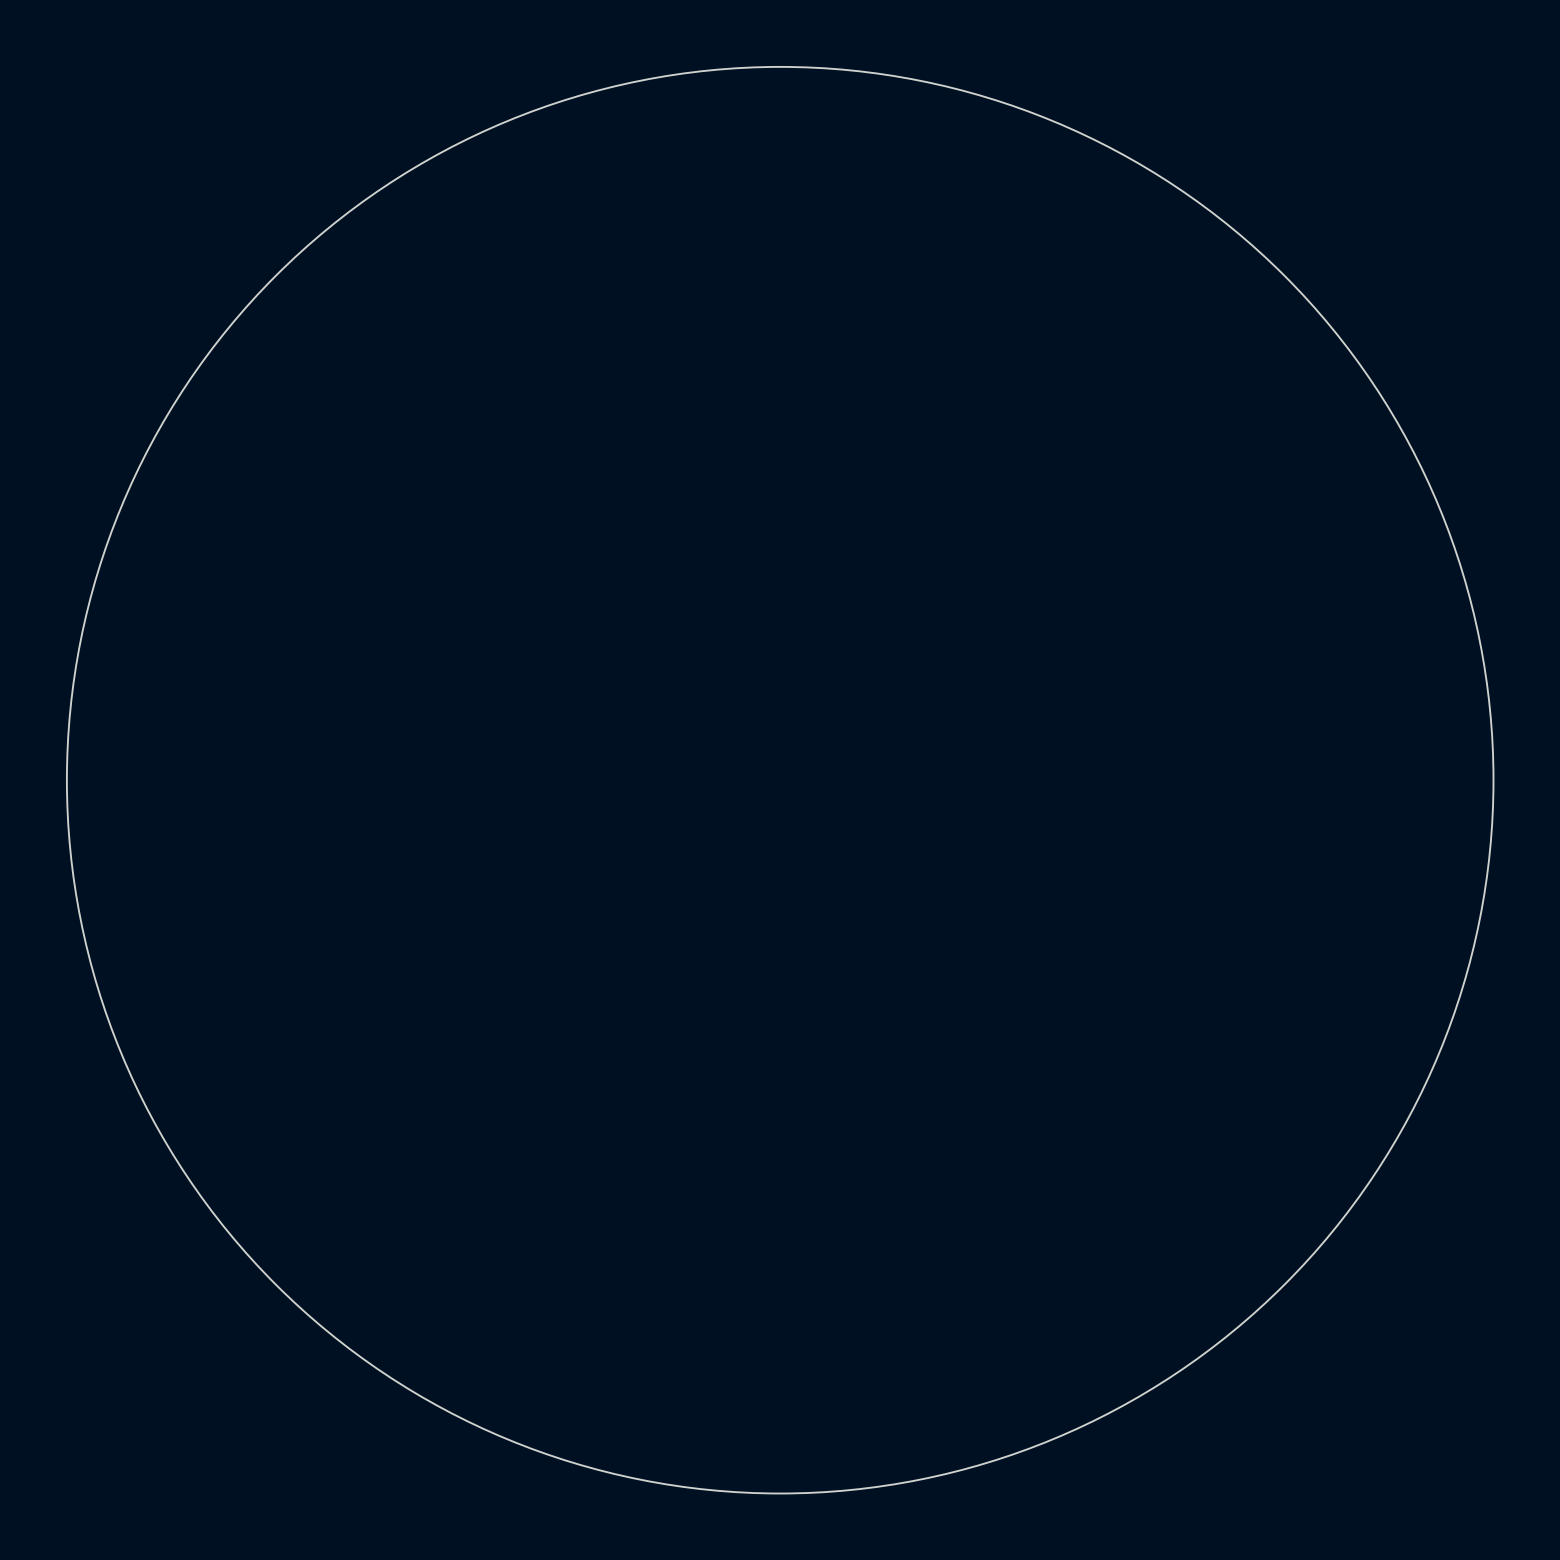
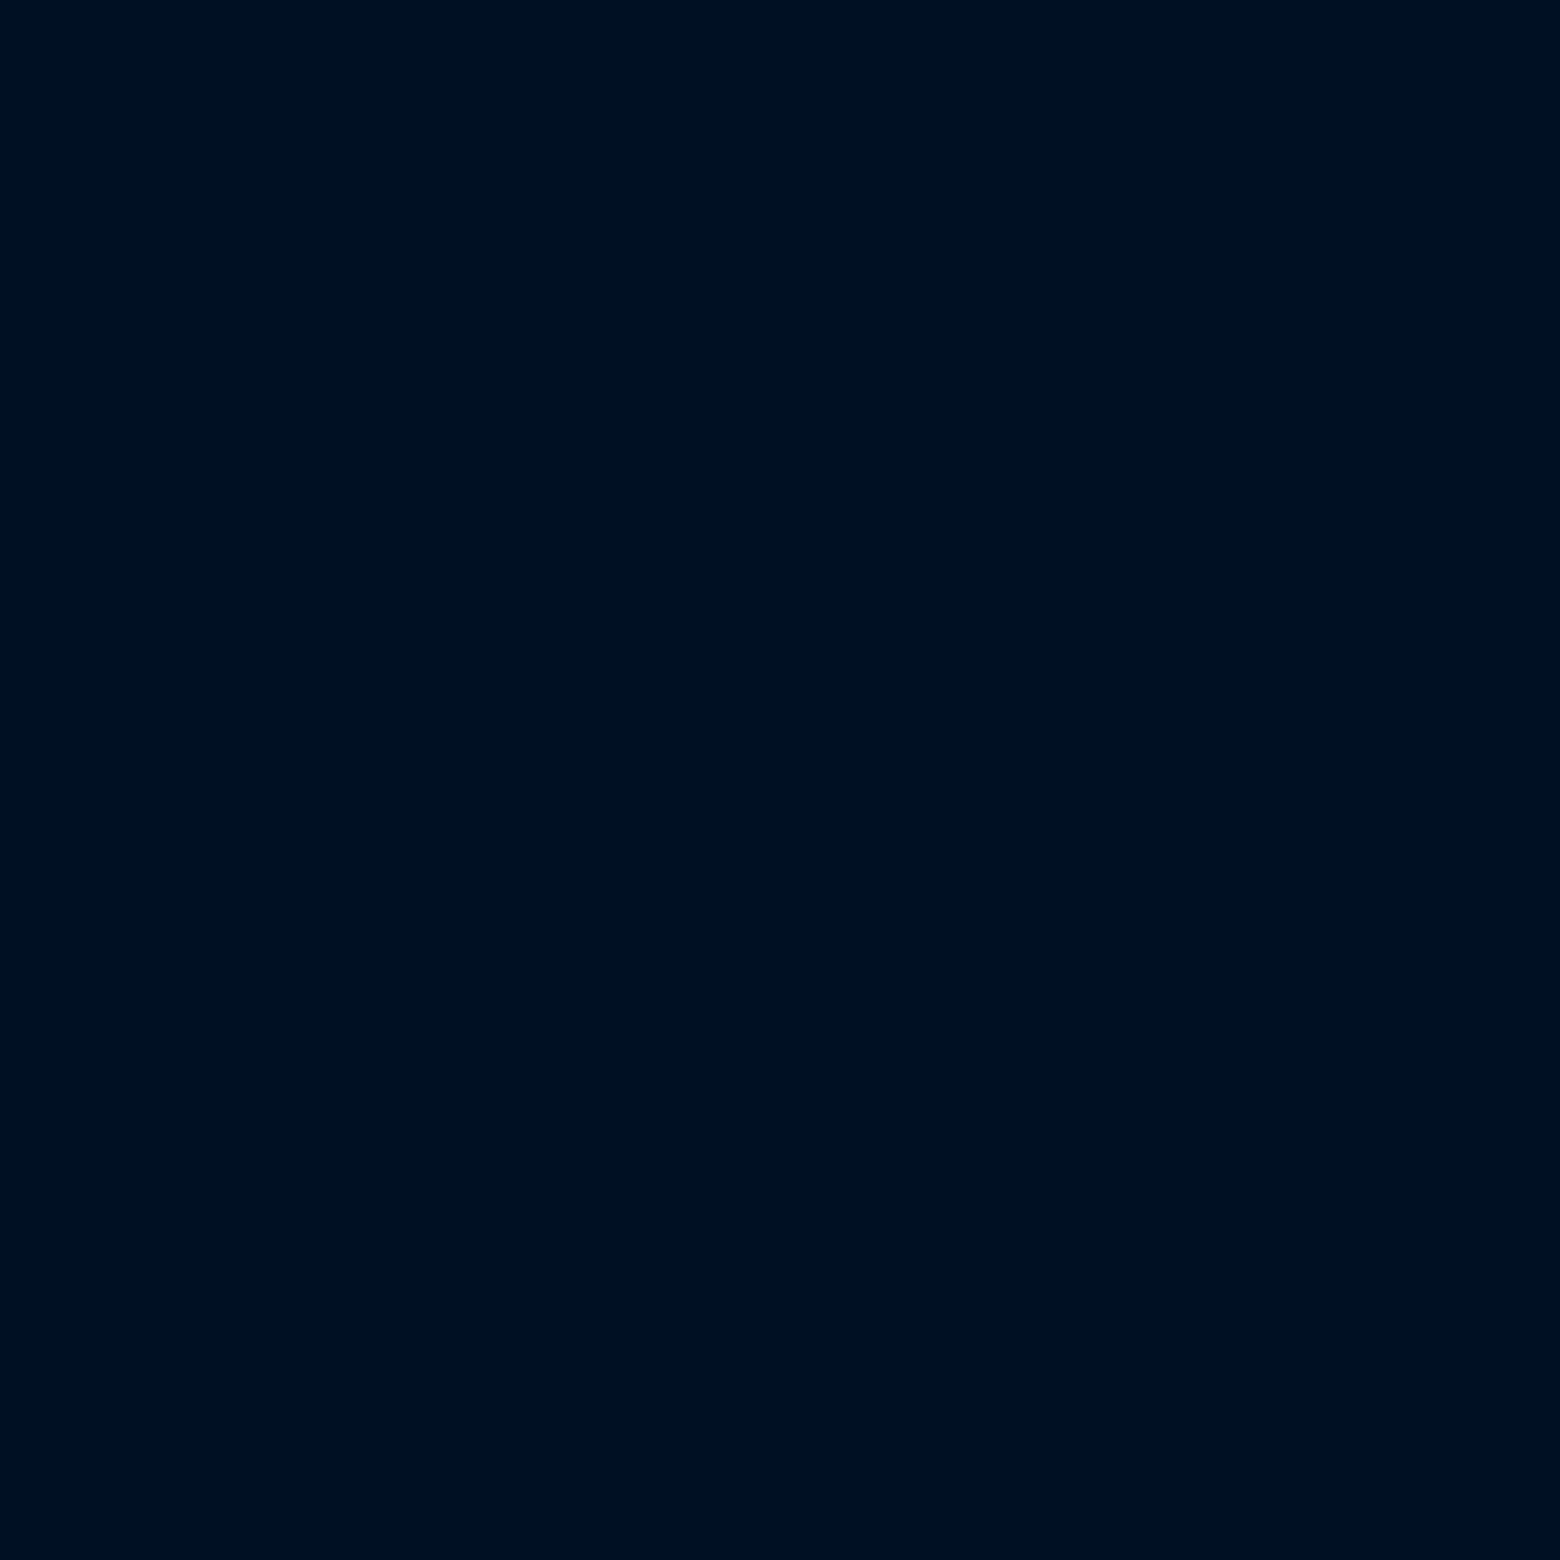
round board edge: [66, 66, 1495, 1495] -> none

